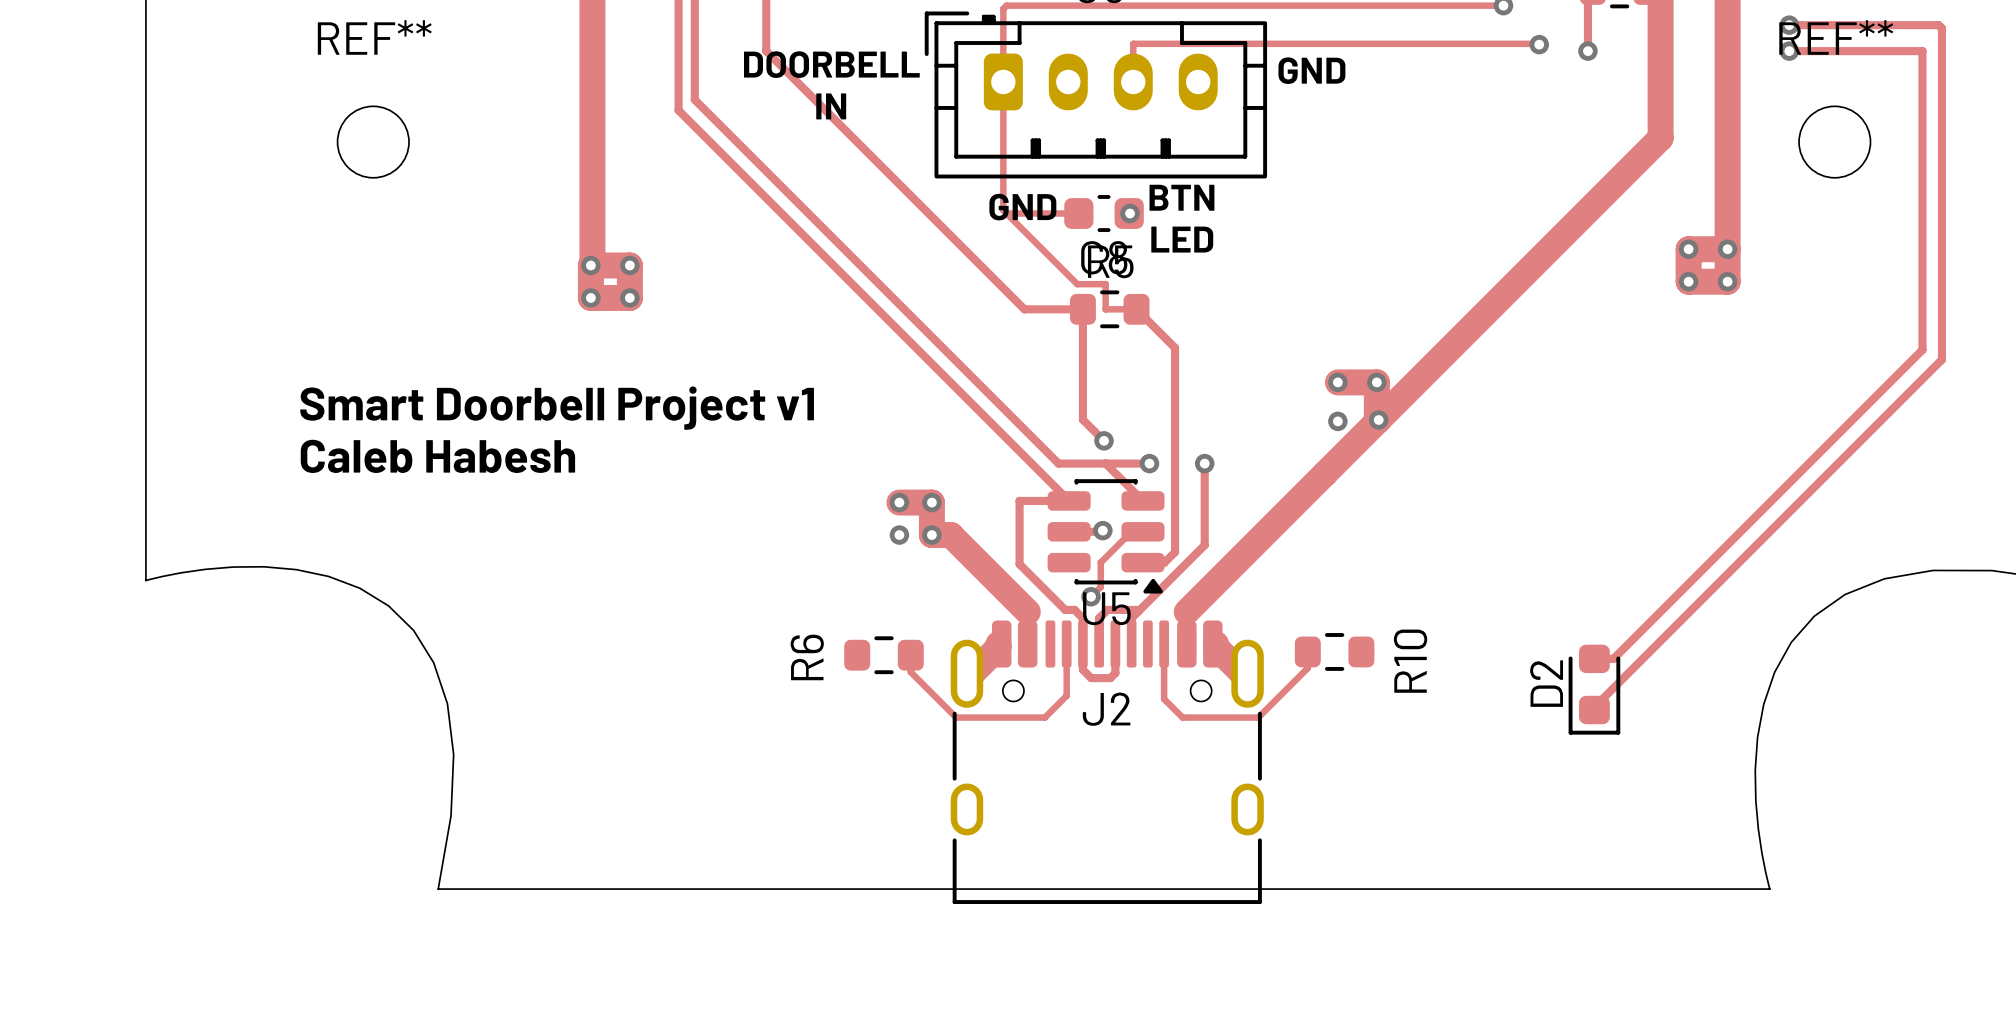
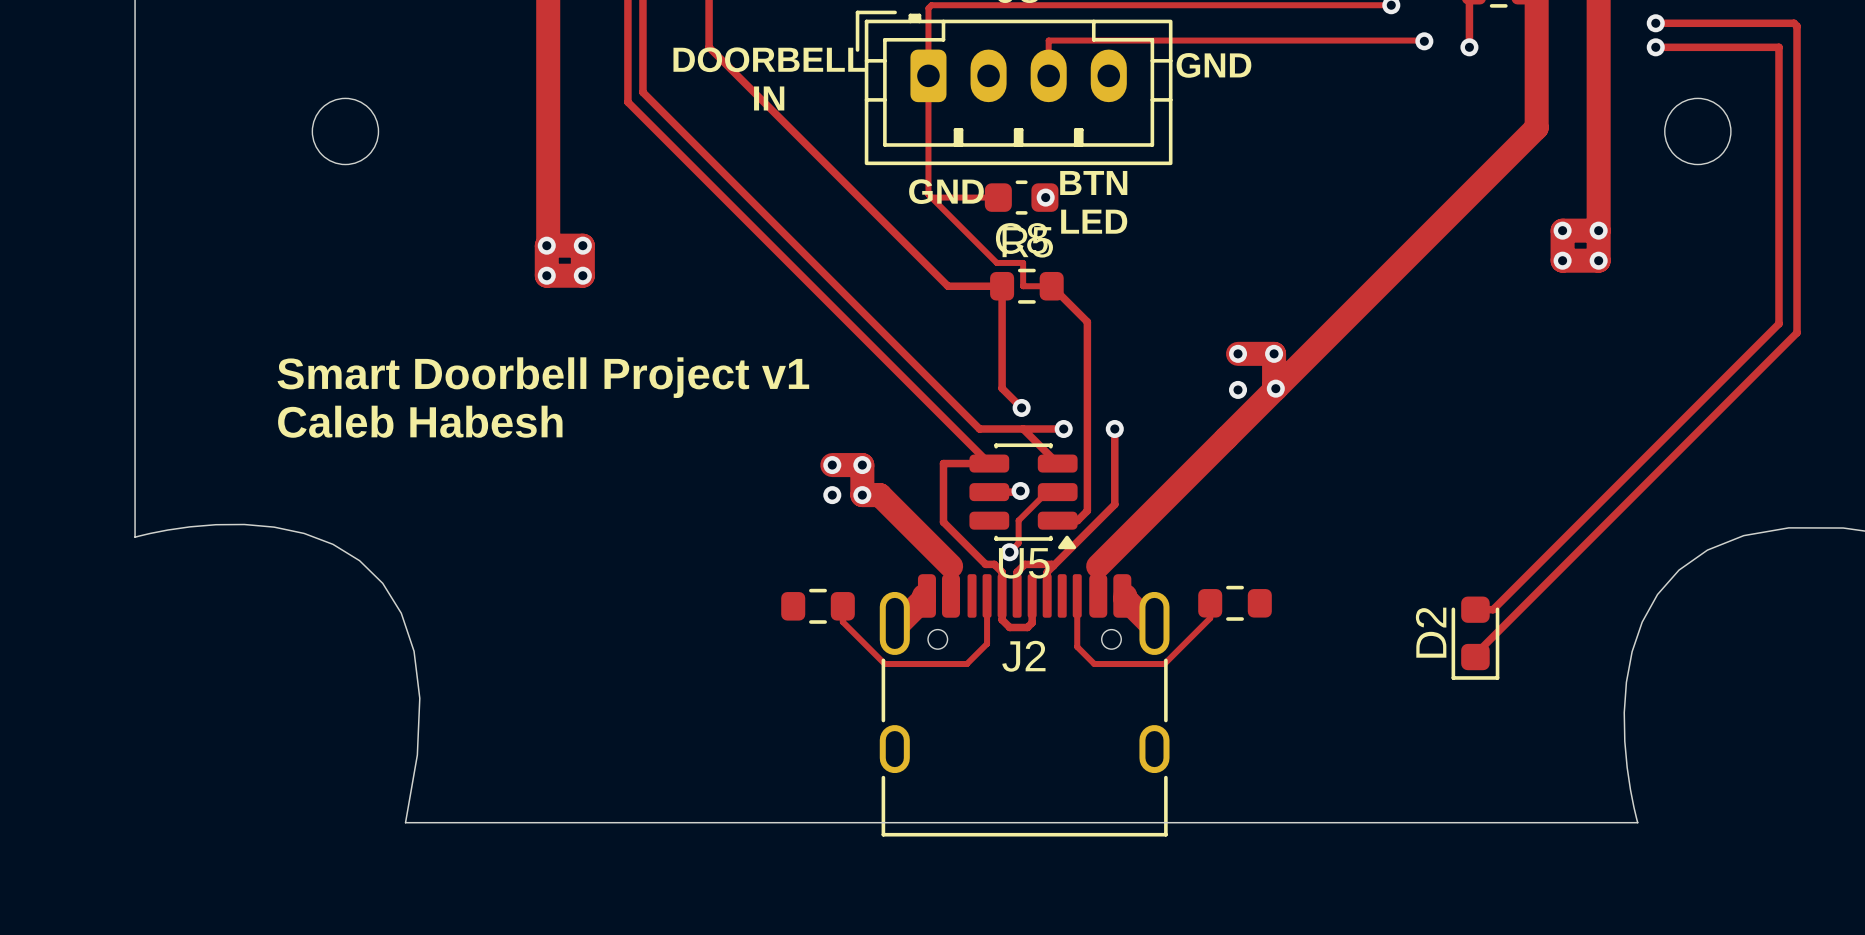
REF** name: REF** (374, 37) -> none
REF** name: REF** (1836, 37) -> none
R6 name: R6 (807, 657) -> none
R10 name: R10 (1410, 661) -> none

